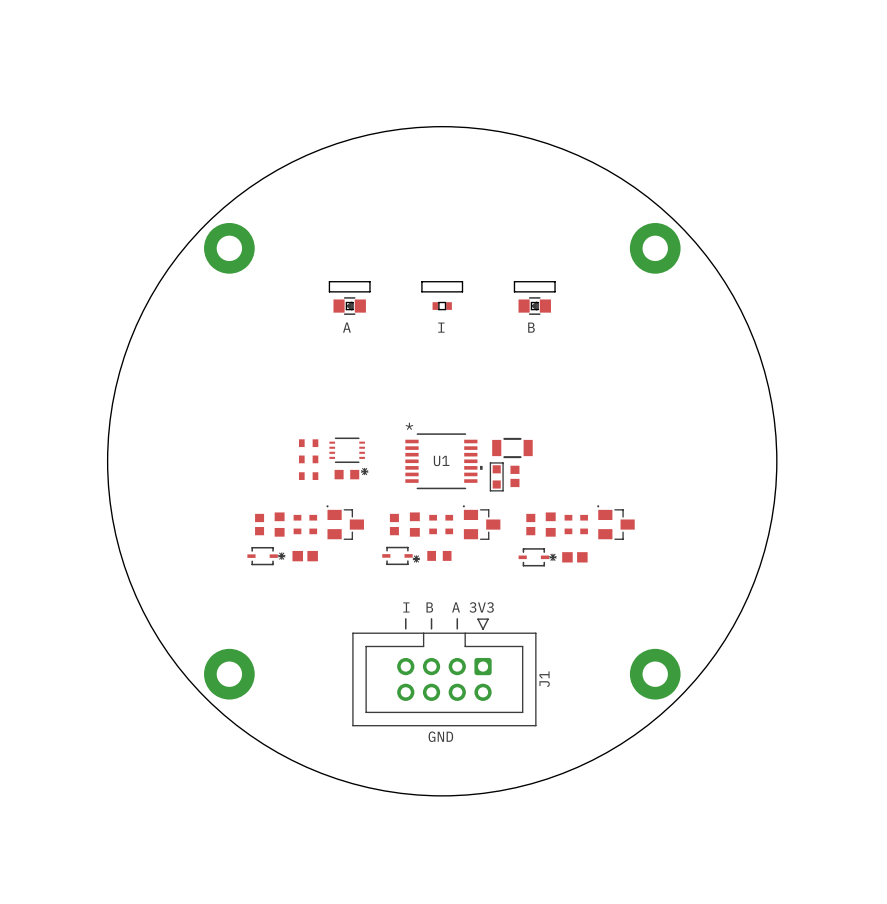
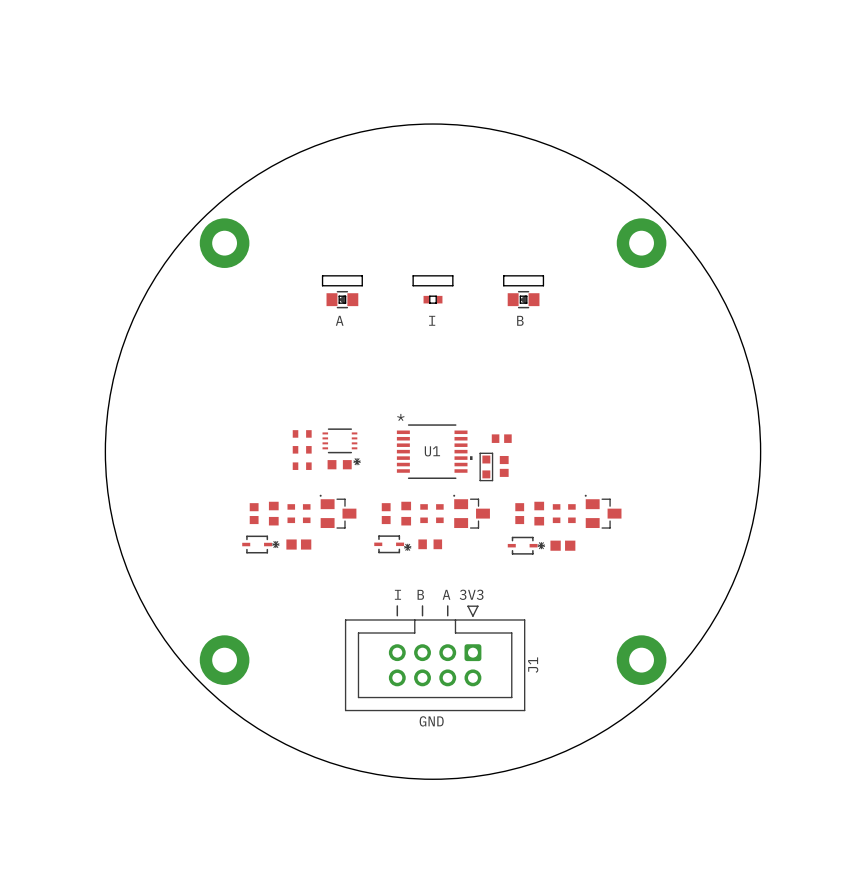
part footprint: [492, 437, 533, 459] -> [491, 434, 512, 443]

